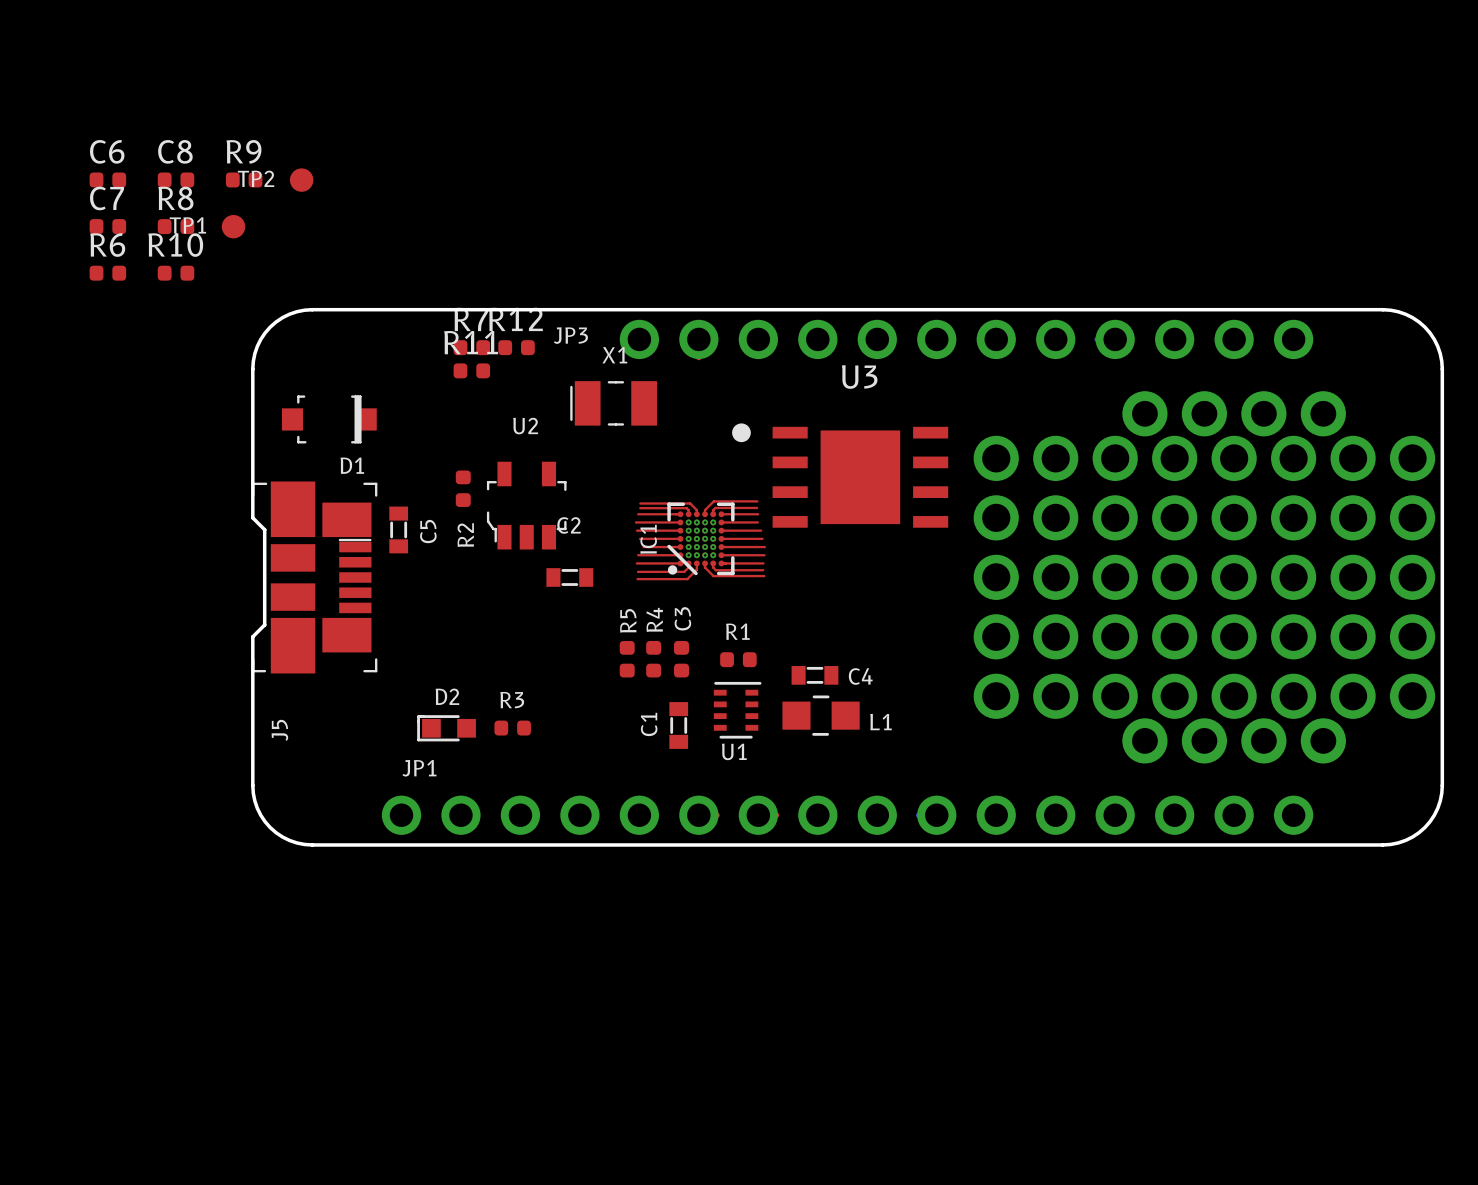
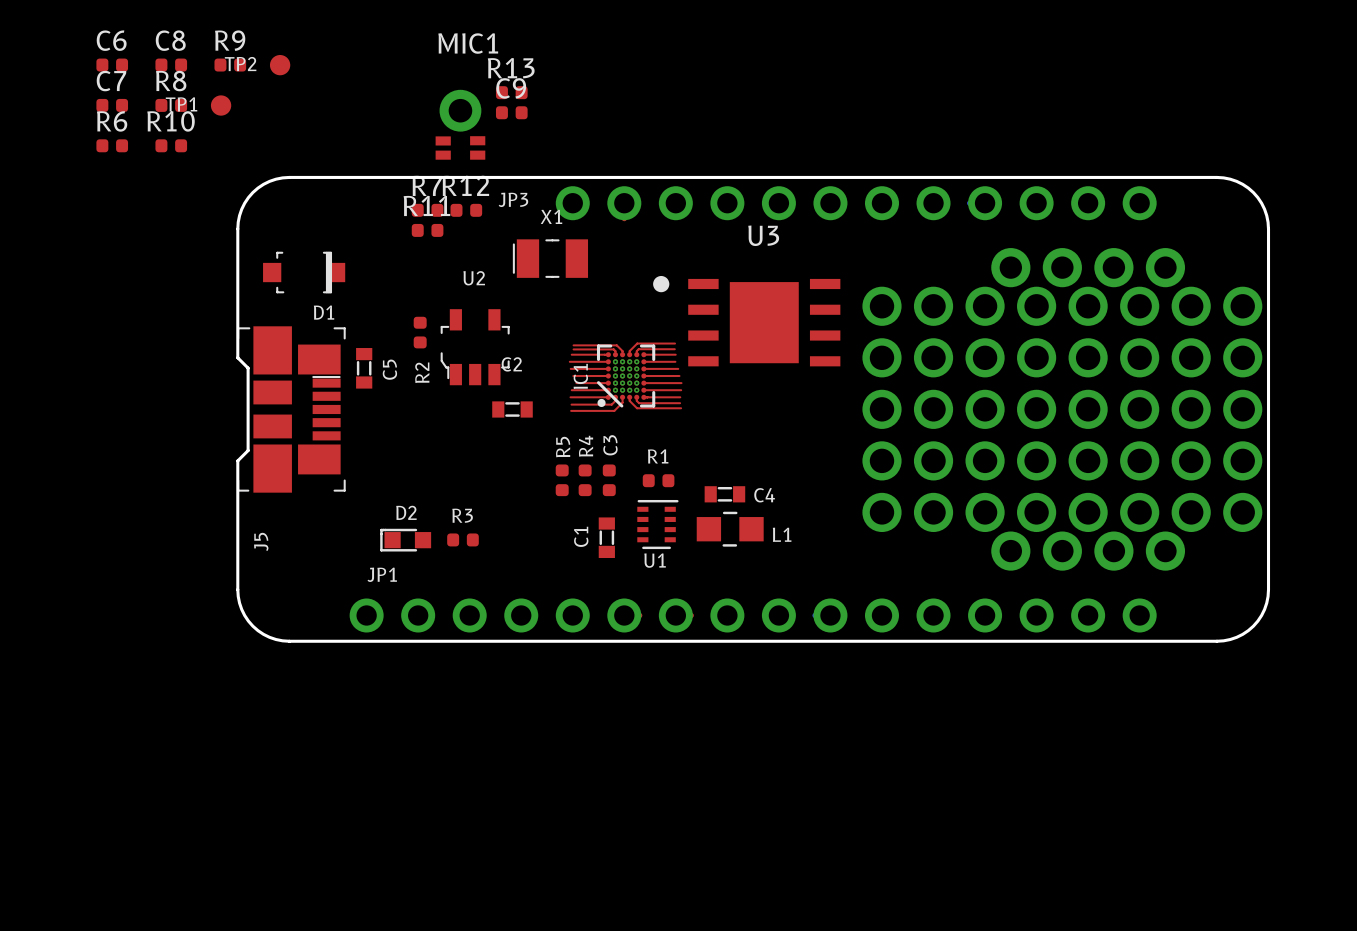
R13: none -> (511, 92)
C9: none -> (511, 112)
MIC1: none -> (460, 124)

